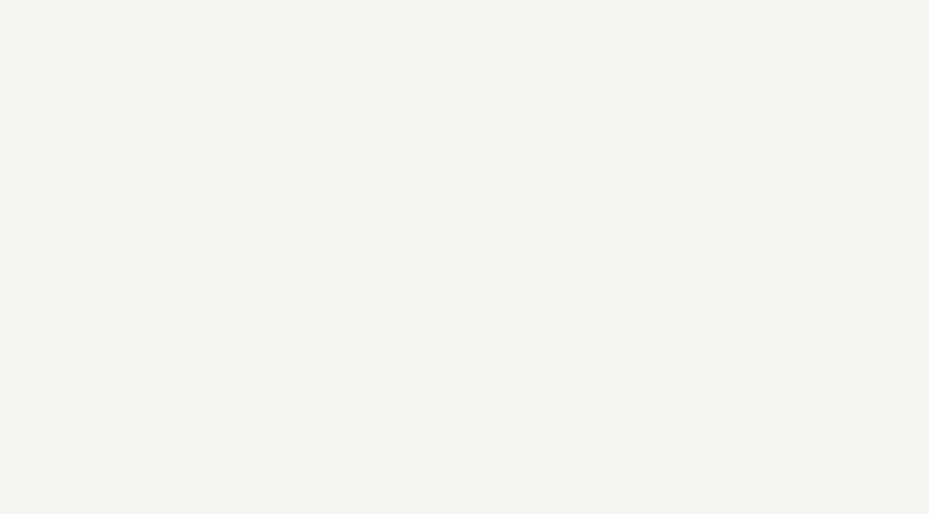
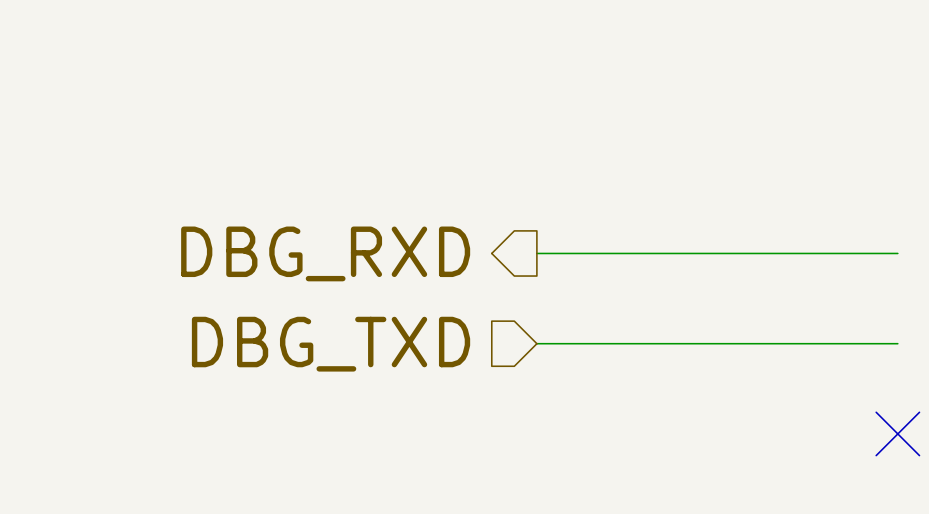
hierarchical label: none -> DBG_RXD (325, 253)
wire: none -> (536, 253) (897, 253)
wire: none -> (536, 343) (897, 343)
hierarchical label: none -> DBG_TXD (331, 344)
no-connect mark: none -> (897, 433)

